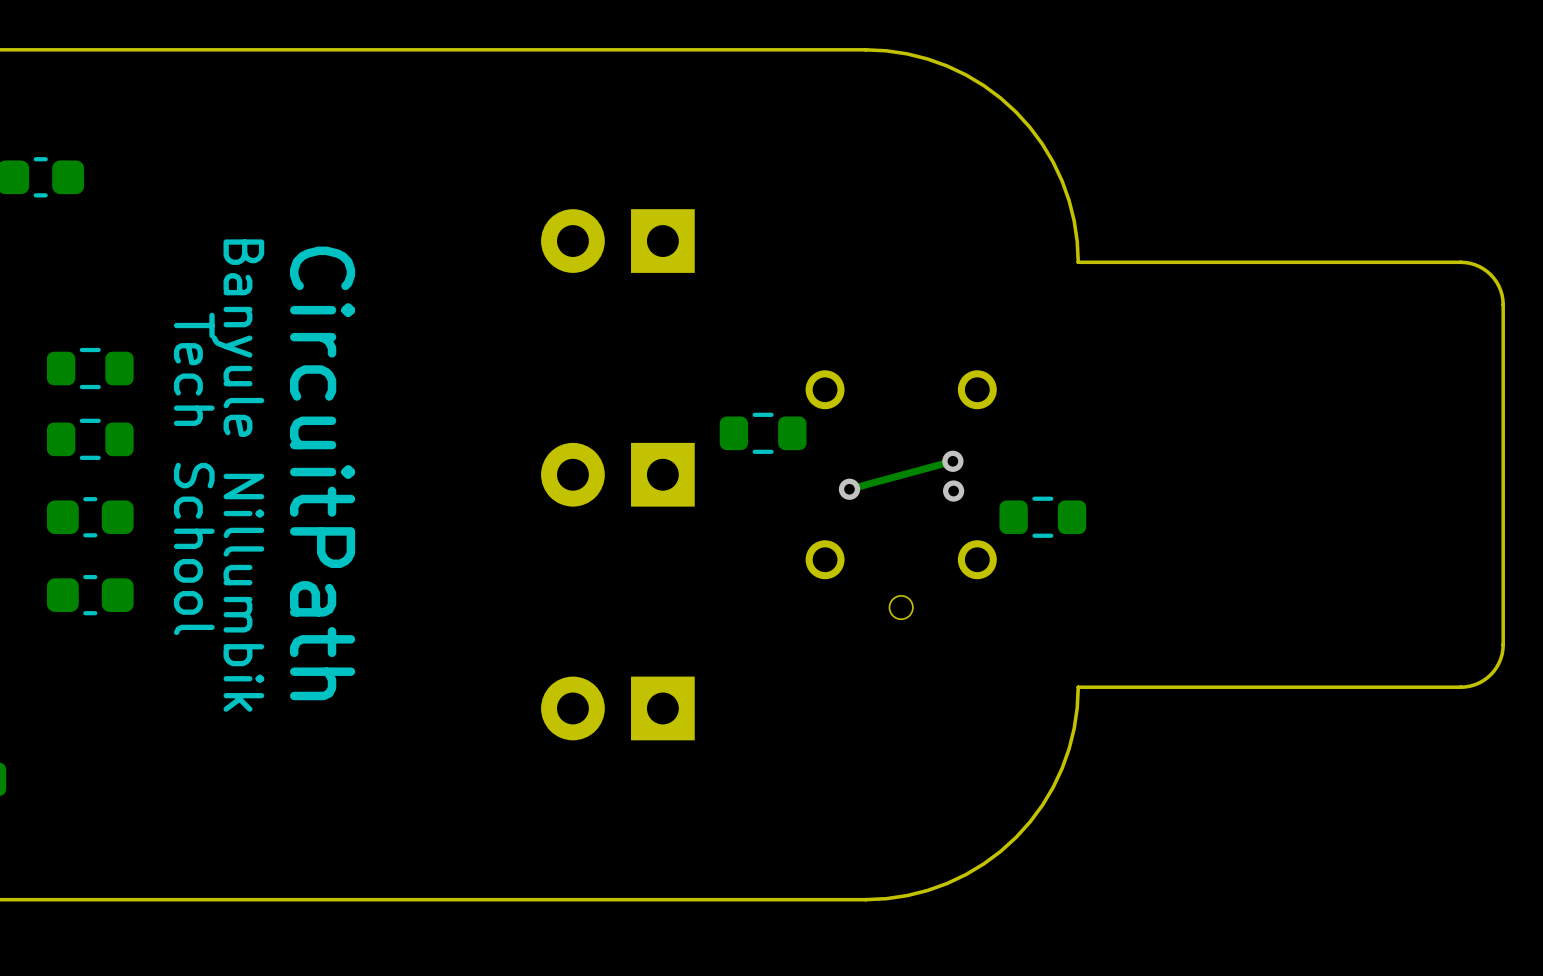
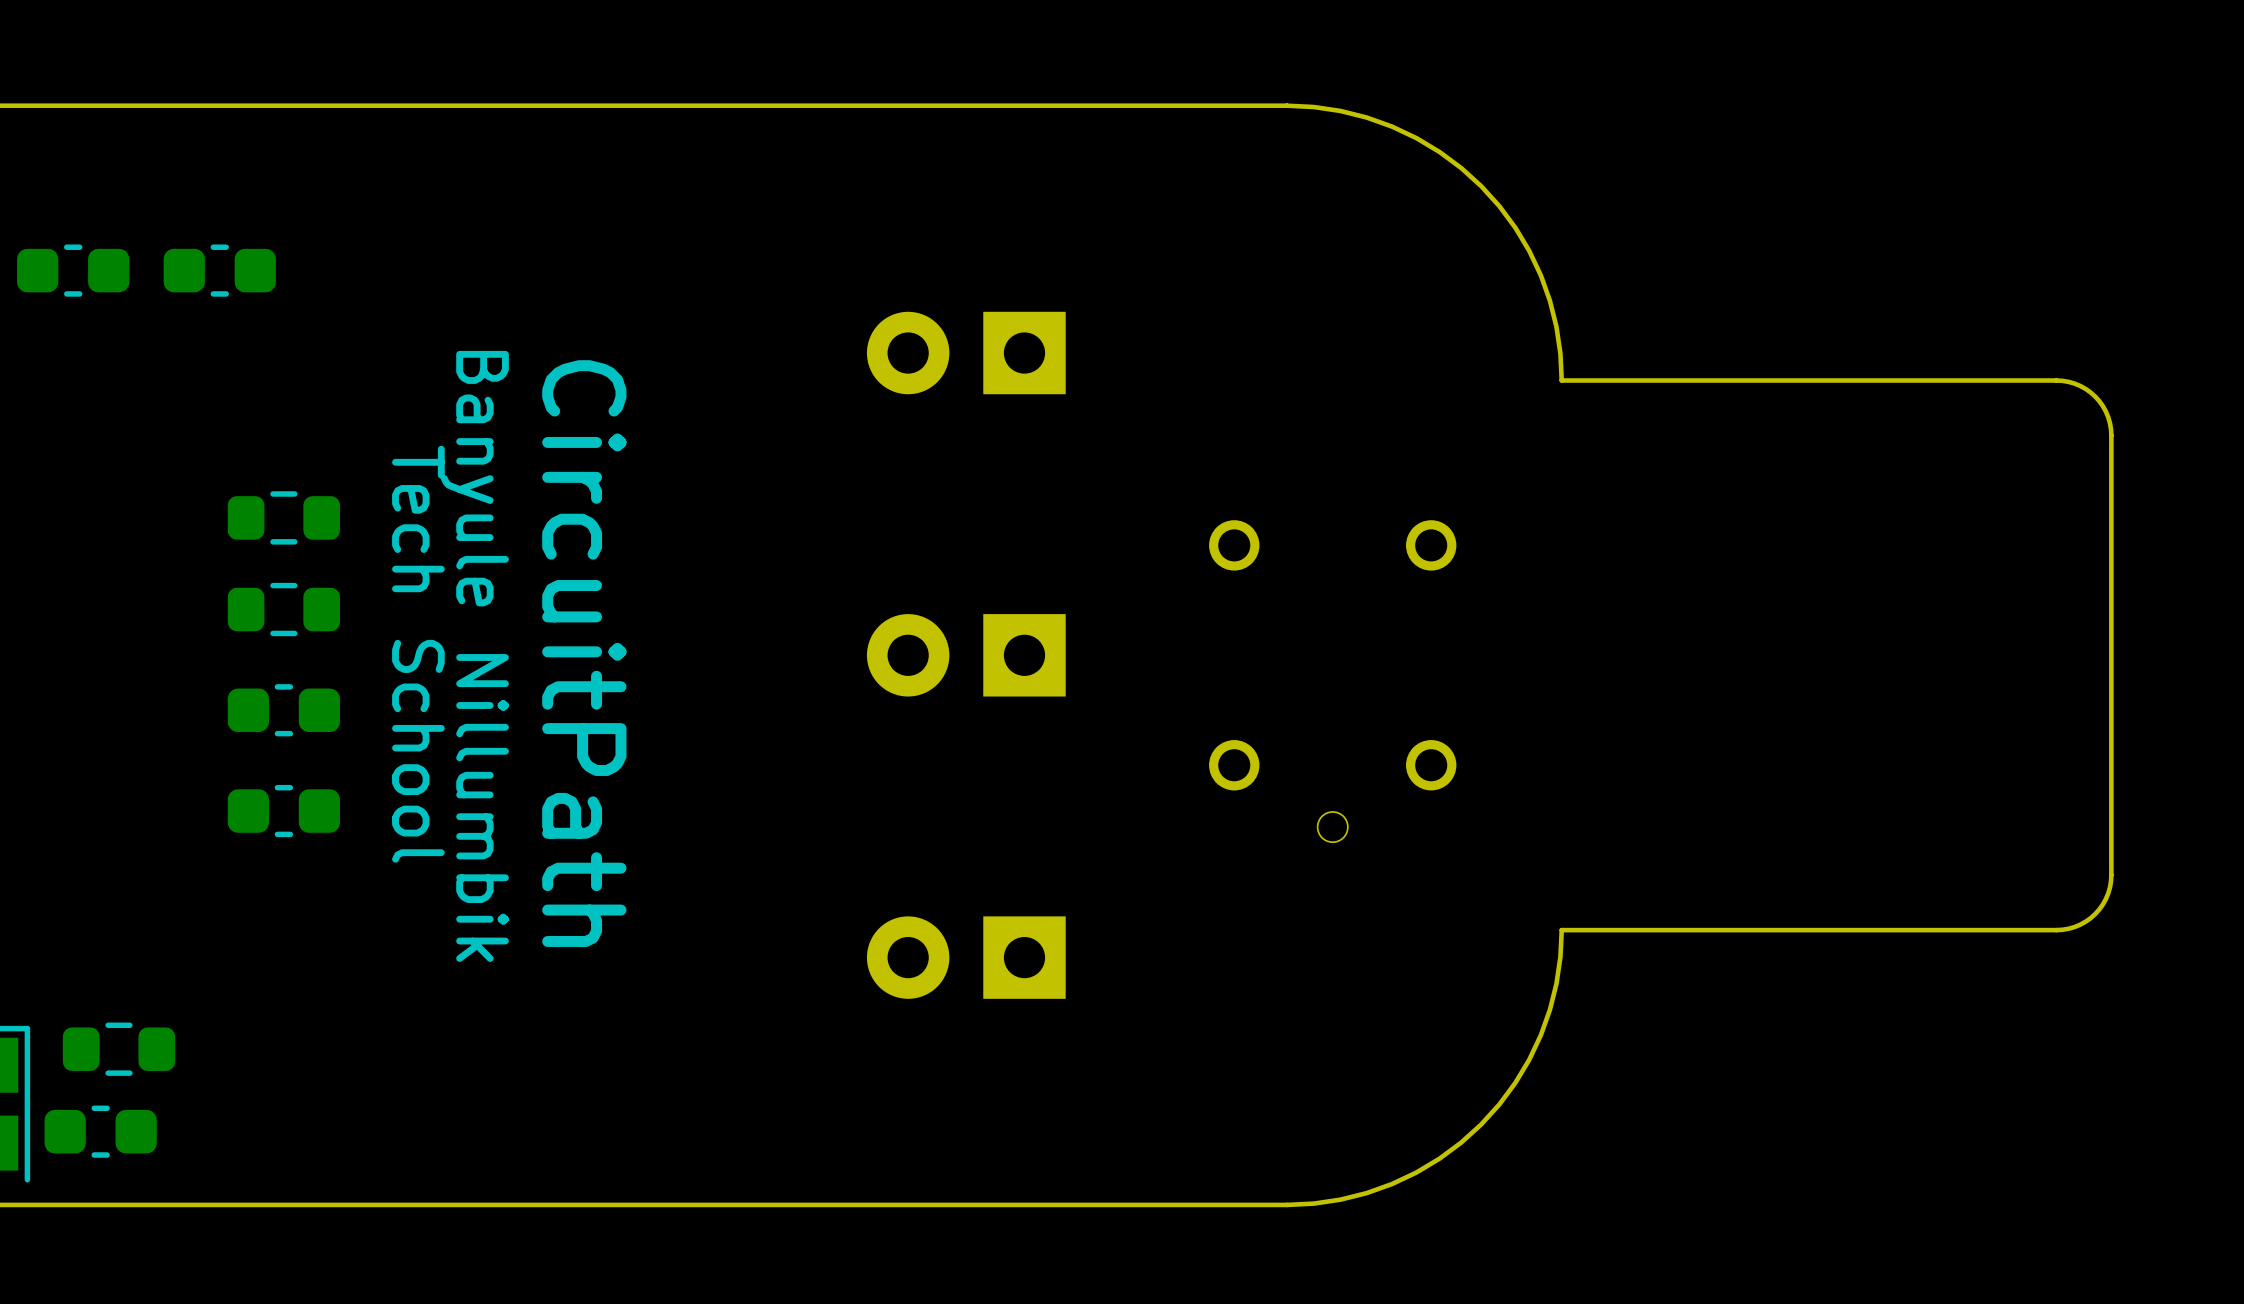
part: (763, 433) -> none
track: (952, 461) (849, 489) -> none
via: (952, 461) -> none
via: (849, 489) -> none
via: (953, 491) -> none
part: (1042, 517) -> none

